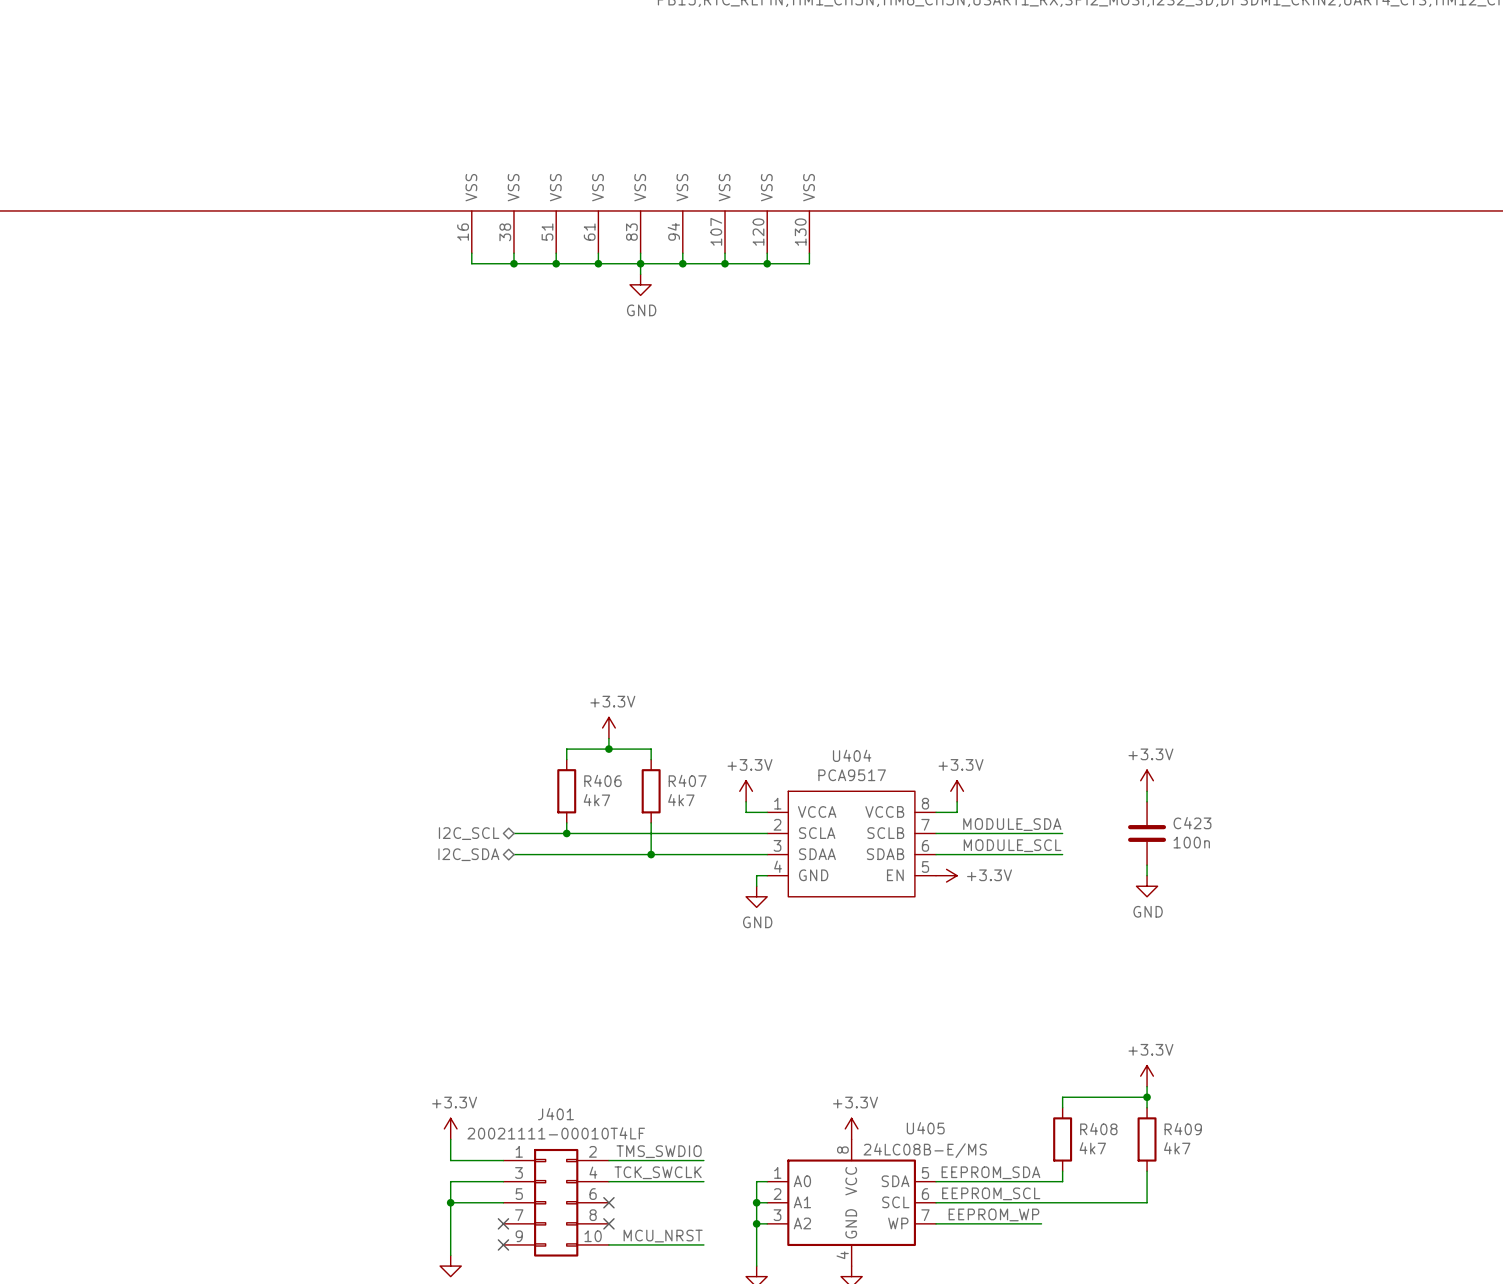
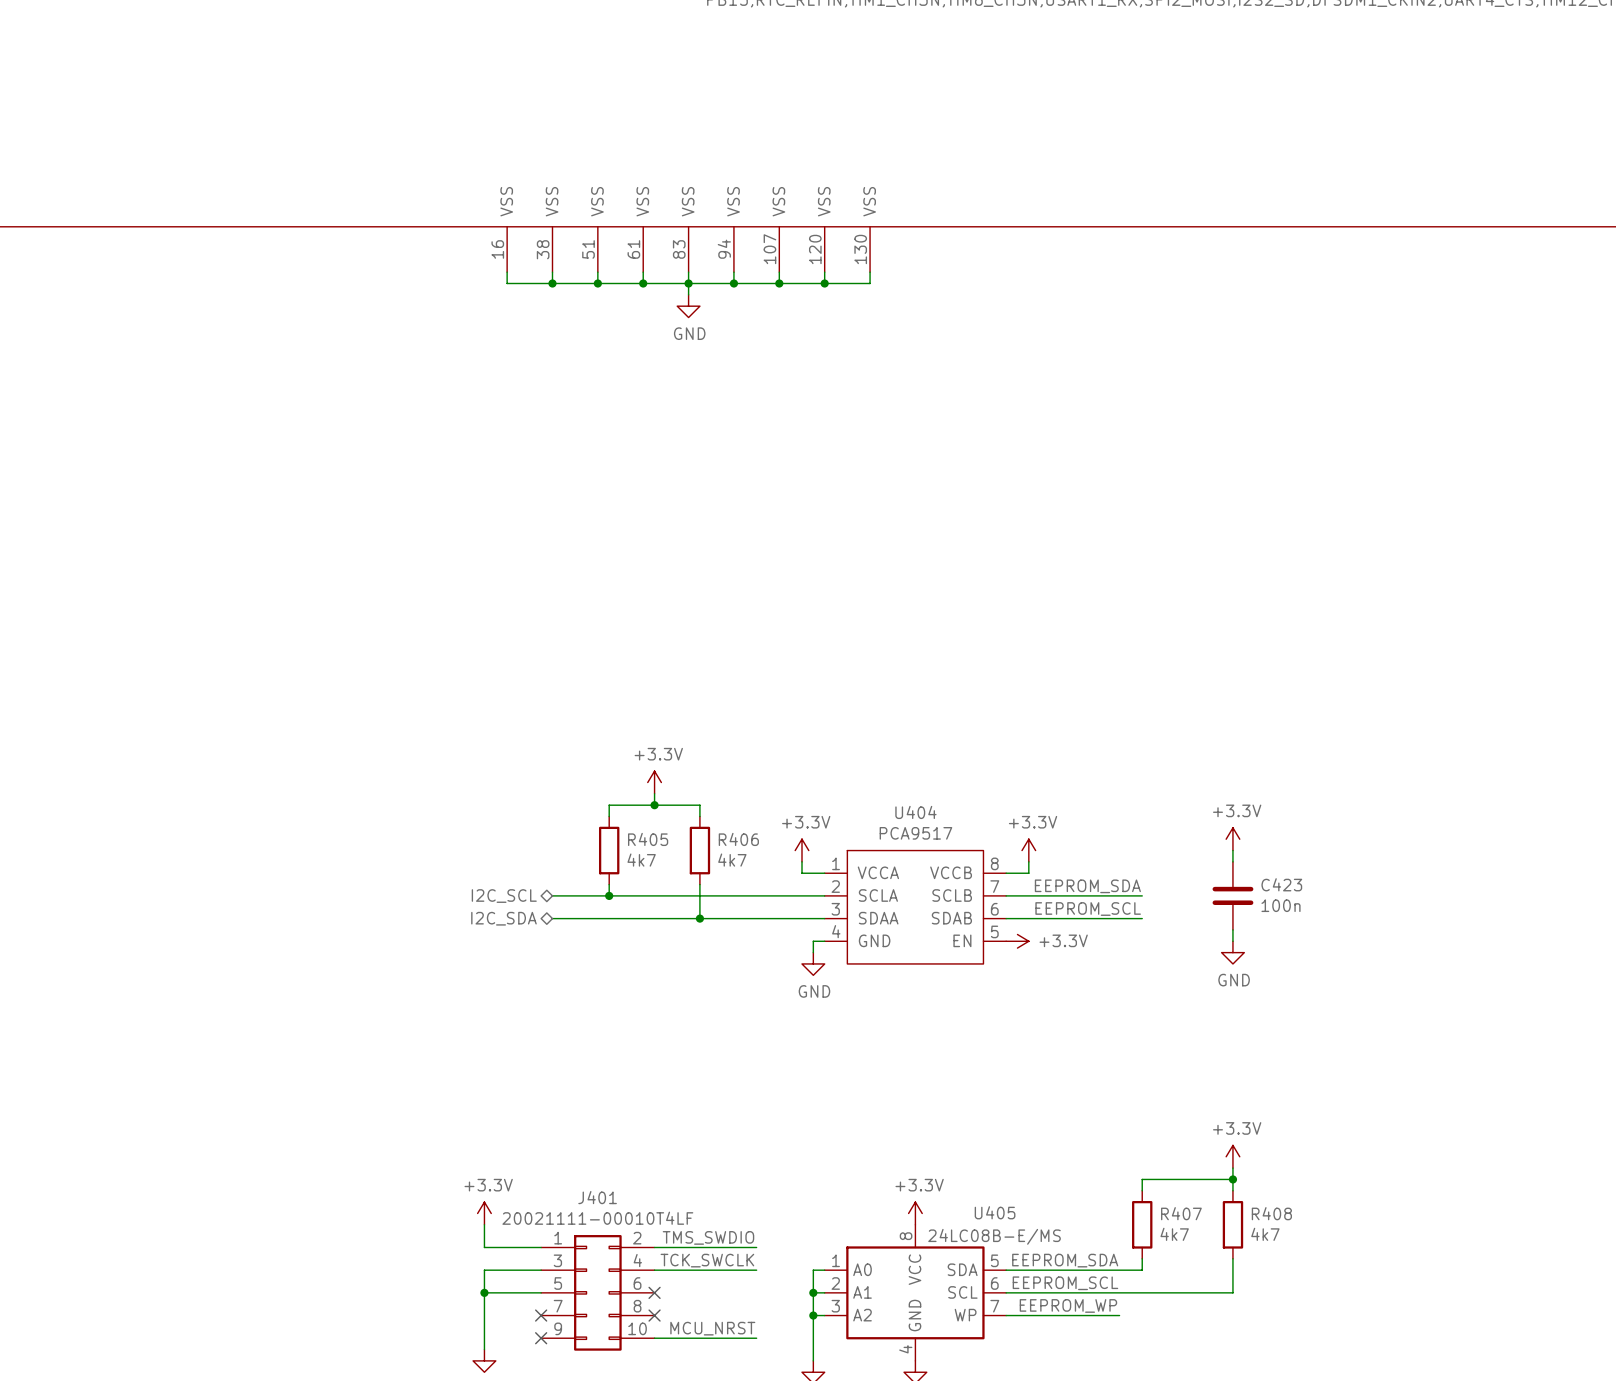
R406 name: R406 (602, 780) -> R405 (648, 839)
R407 name: R407 (687, 780) -> R406 (738, 839)
label: MODULE_SDA (1012, 824) -> EEPROM_SDA (1087, 886)
label: MODULE_SCL (1012, 845) -> EEPROM_SCL (1088, 909)
R408 name: R408 (1098, 1129) -> R407 (1181, 1213)
R409 name: R409 (1183, 1129) -> R408 (1271, 1213)

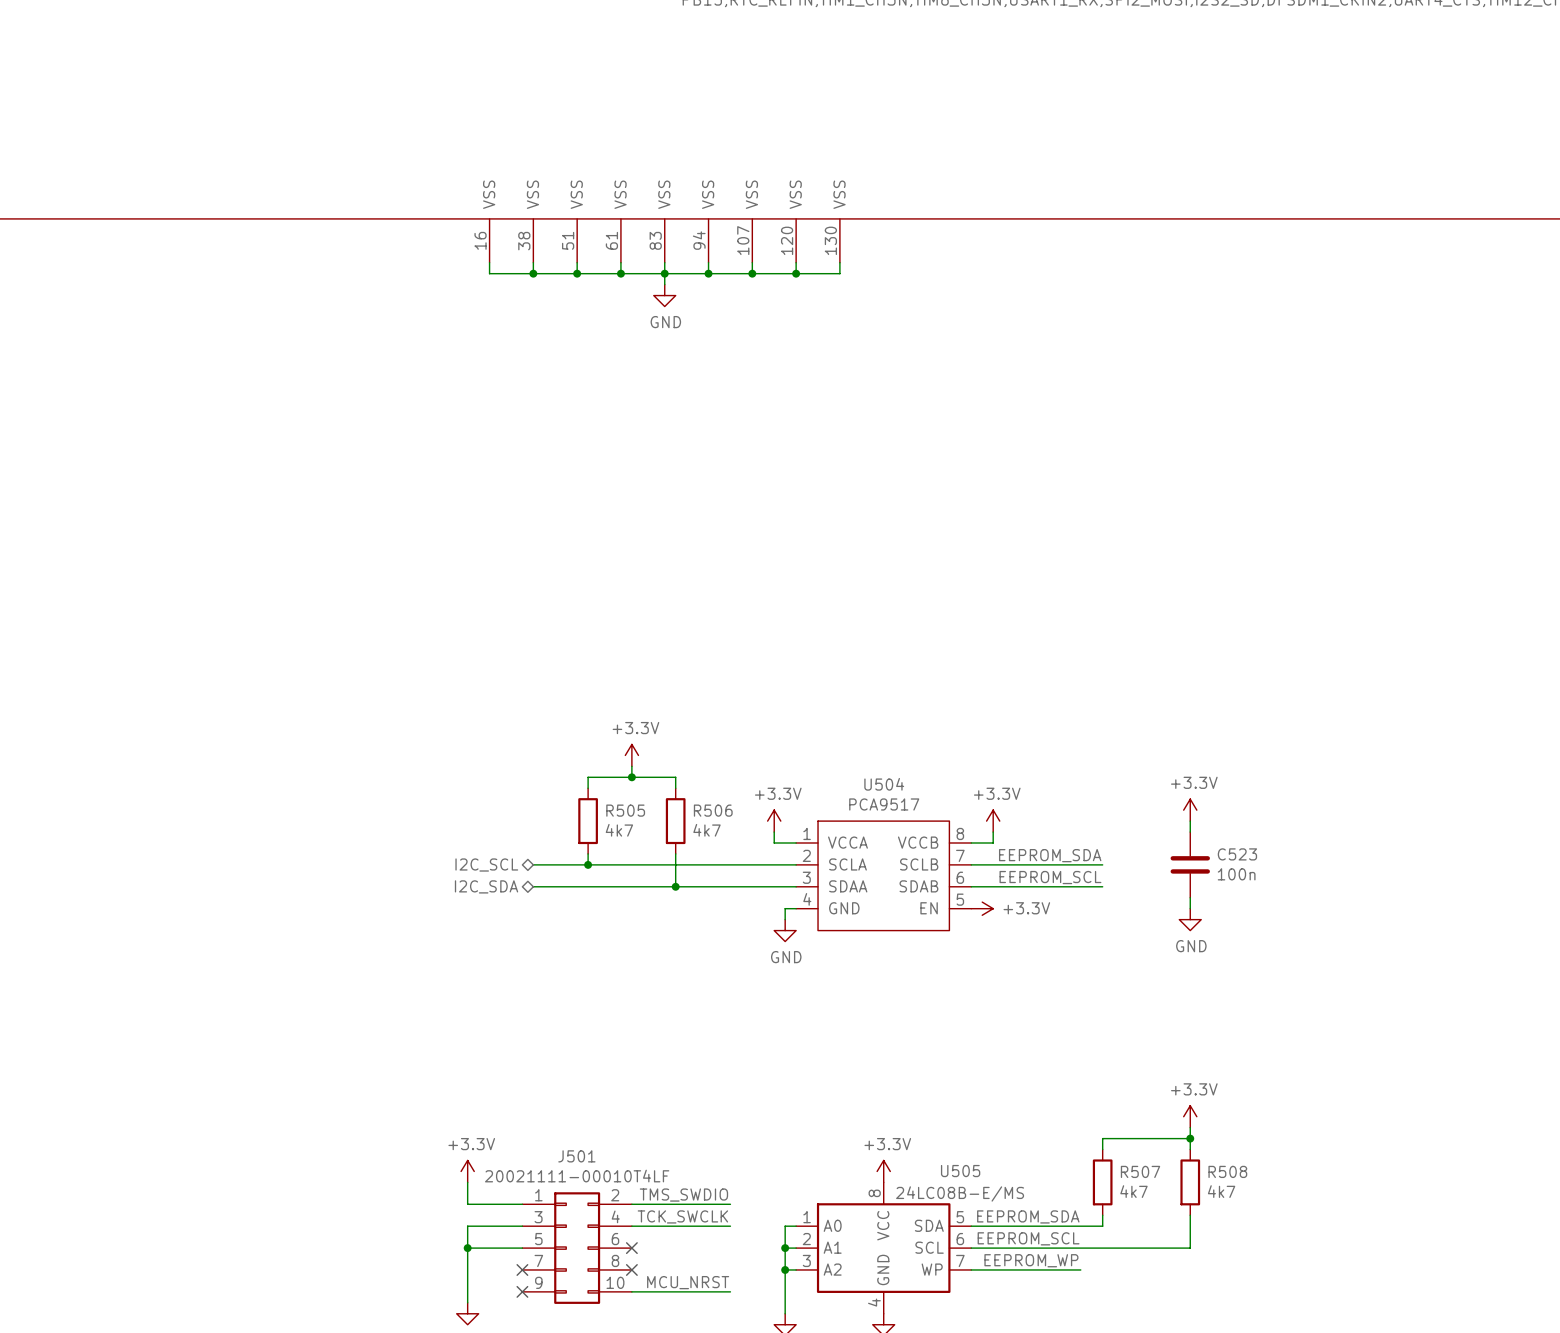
U404 name: U404 (915, 812) -> U504 (884, 784)
R405 name: R405 (648, 839) -> R505 (625, 810)
R406 name: R406 (738, 839) -> R506 (713, 810)
C423 name: C423 (1281, 884) -> C523 (1237, 854)
J401 name: J401 (597, 1197) -> J501 (576, 1156)
U405 name: U405 (995, 1212) -> U505 (960, 1171)
R407 name: R407 (1181, 1213) -> R507 (1140, 1171)
R408 name: R408 (1271, 1213) -> R508 (1227, 1171)

